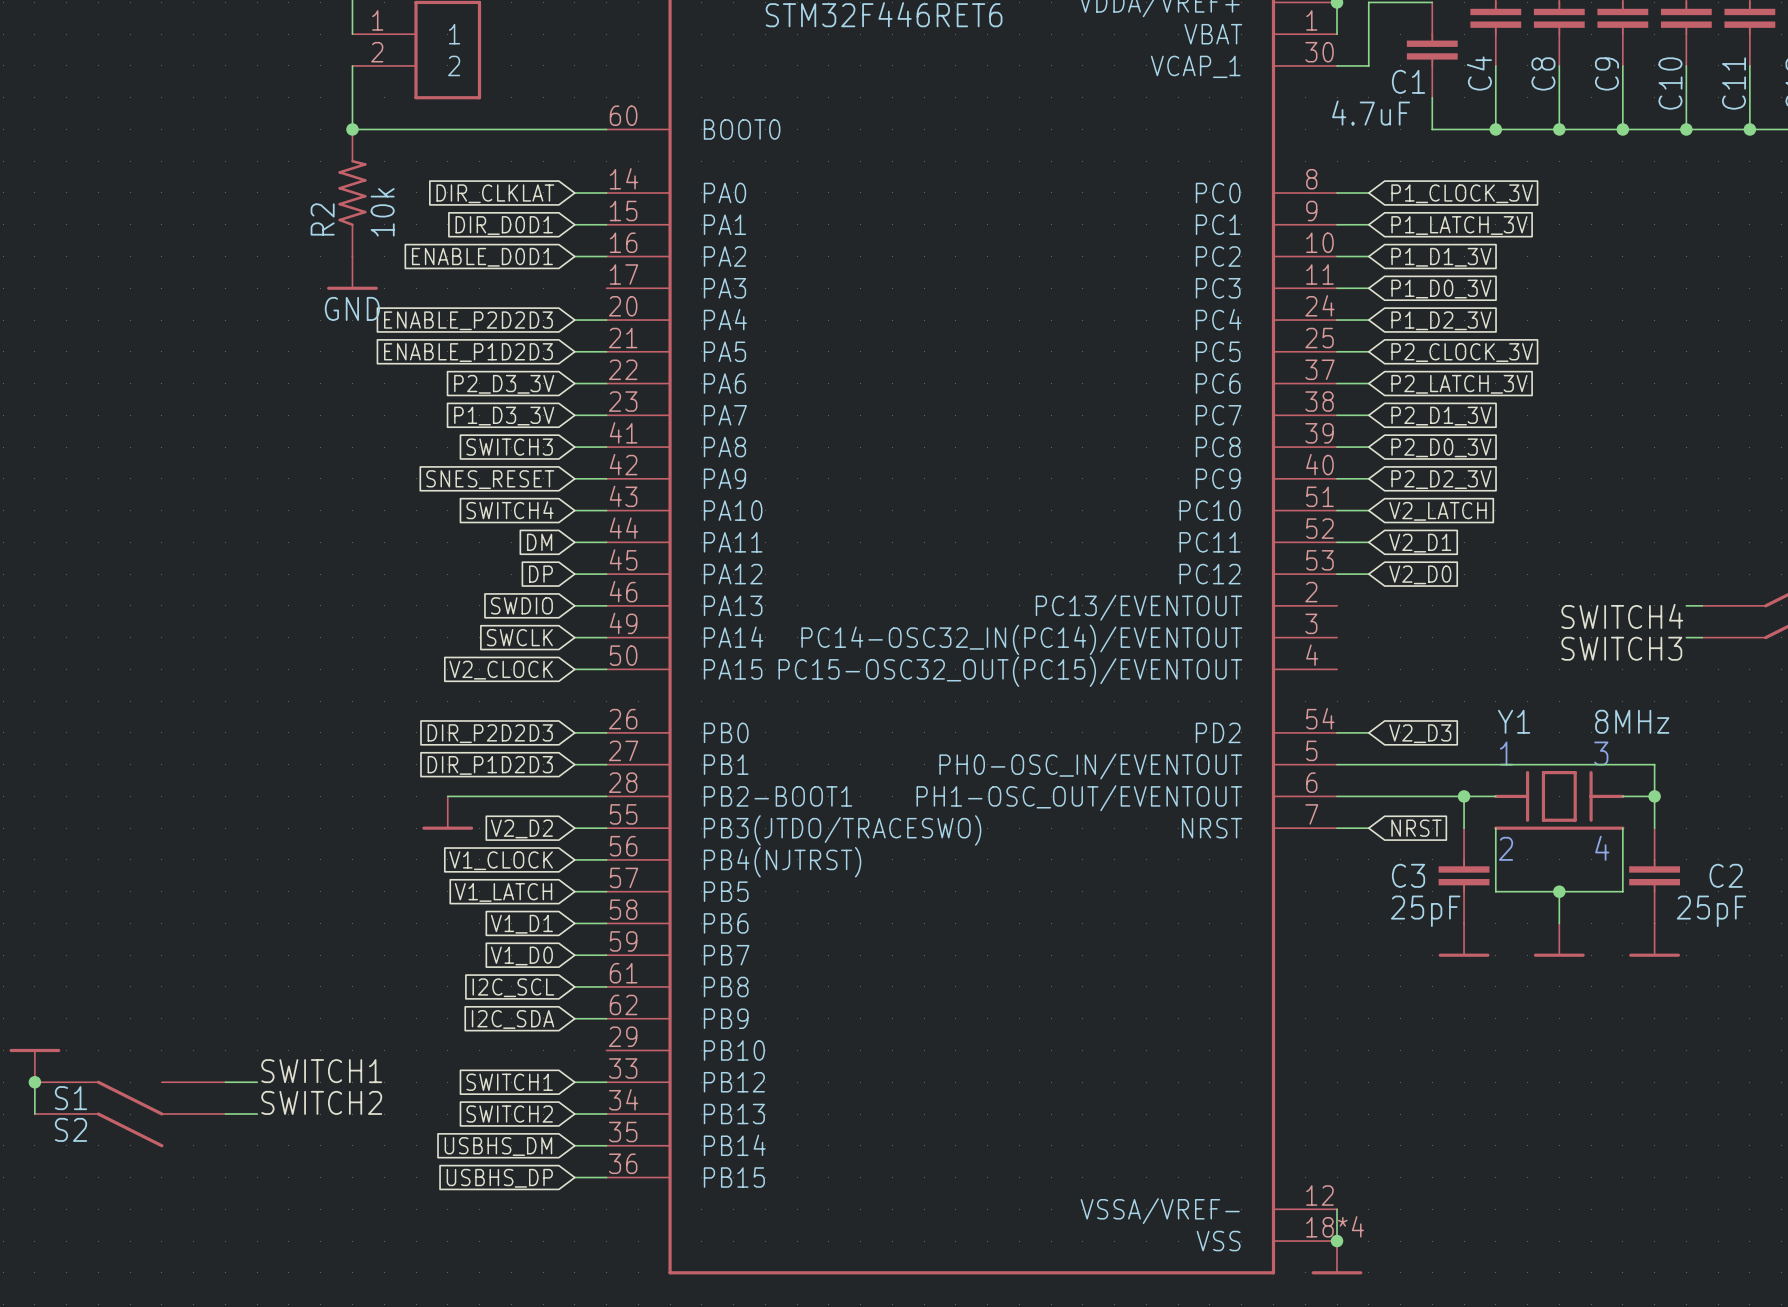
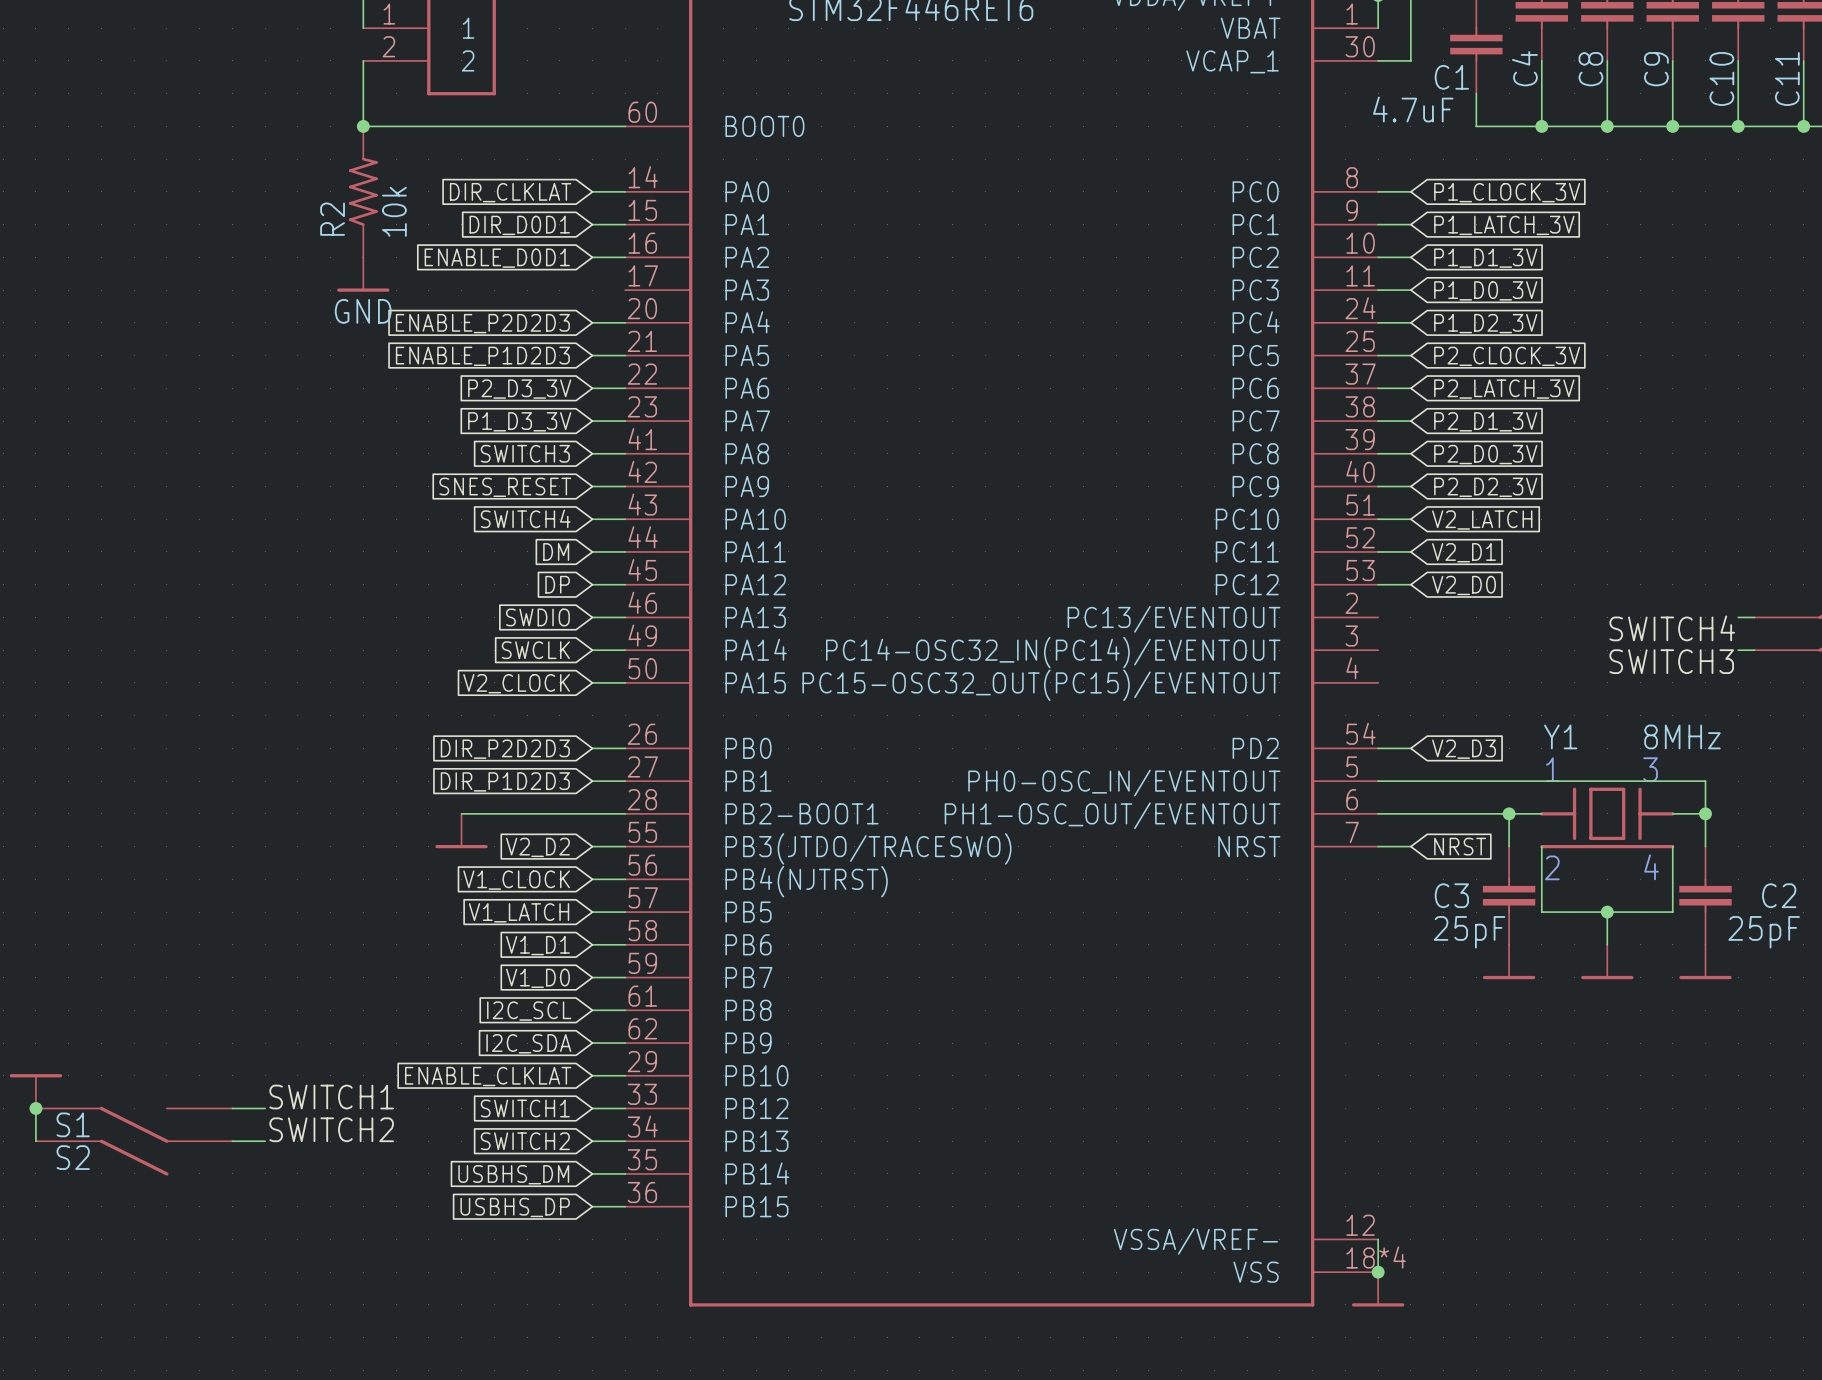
wire: none -> (592, 1075) (625, 1075)
global label: none -> ENABLE_CLKLAT (488, 1076)

